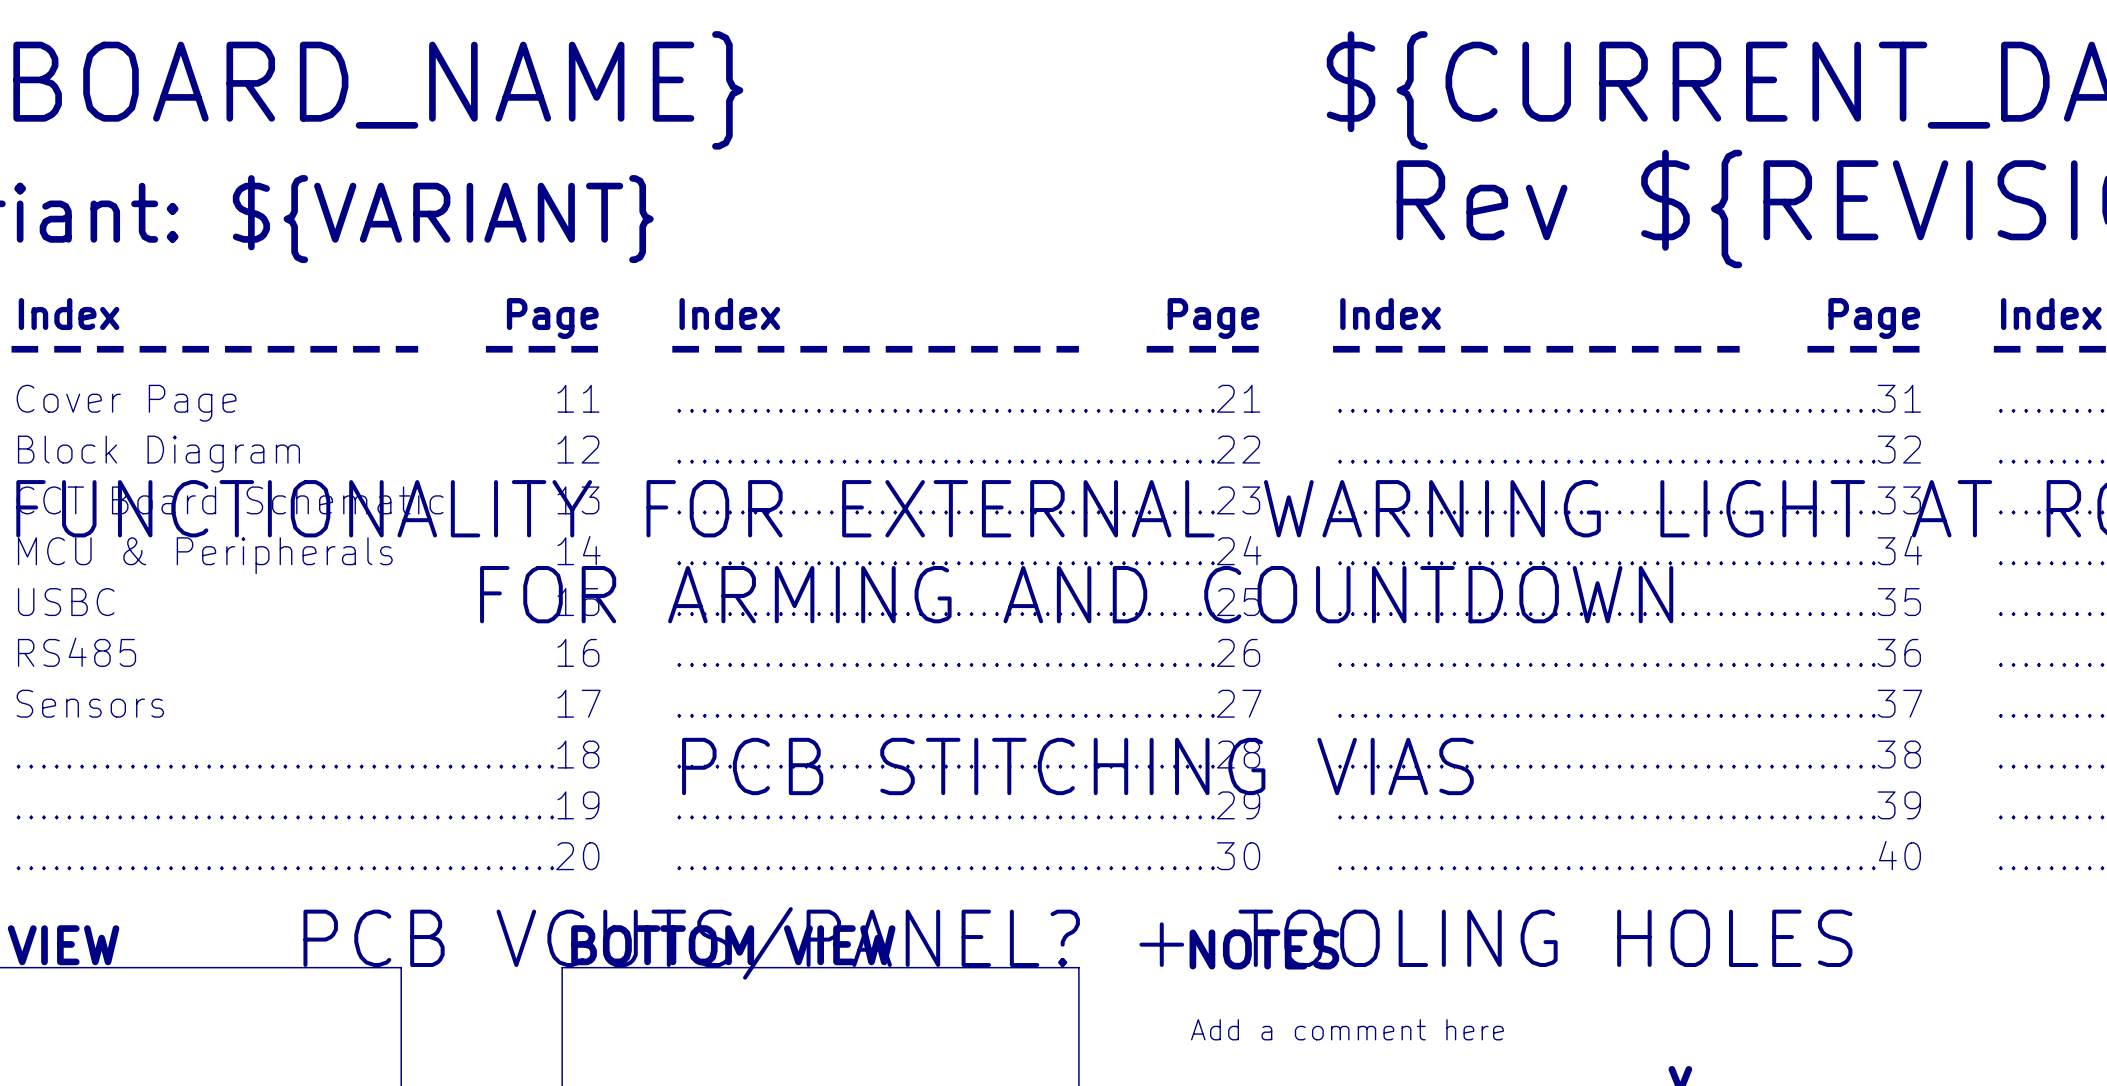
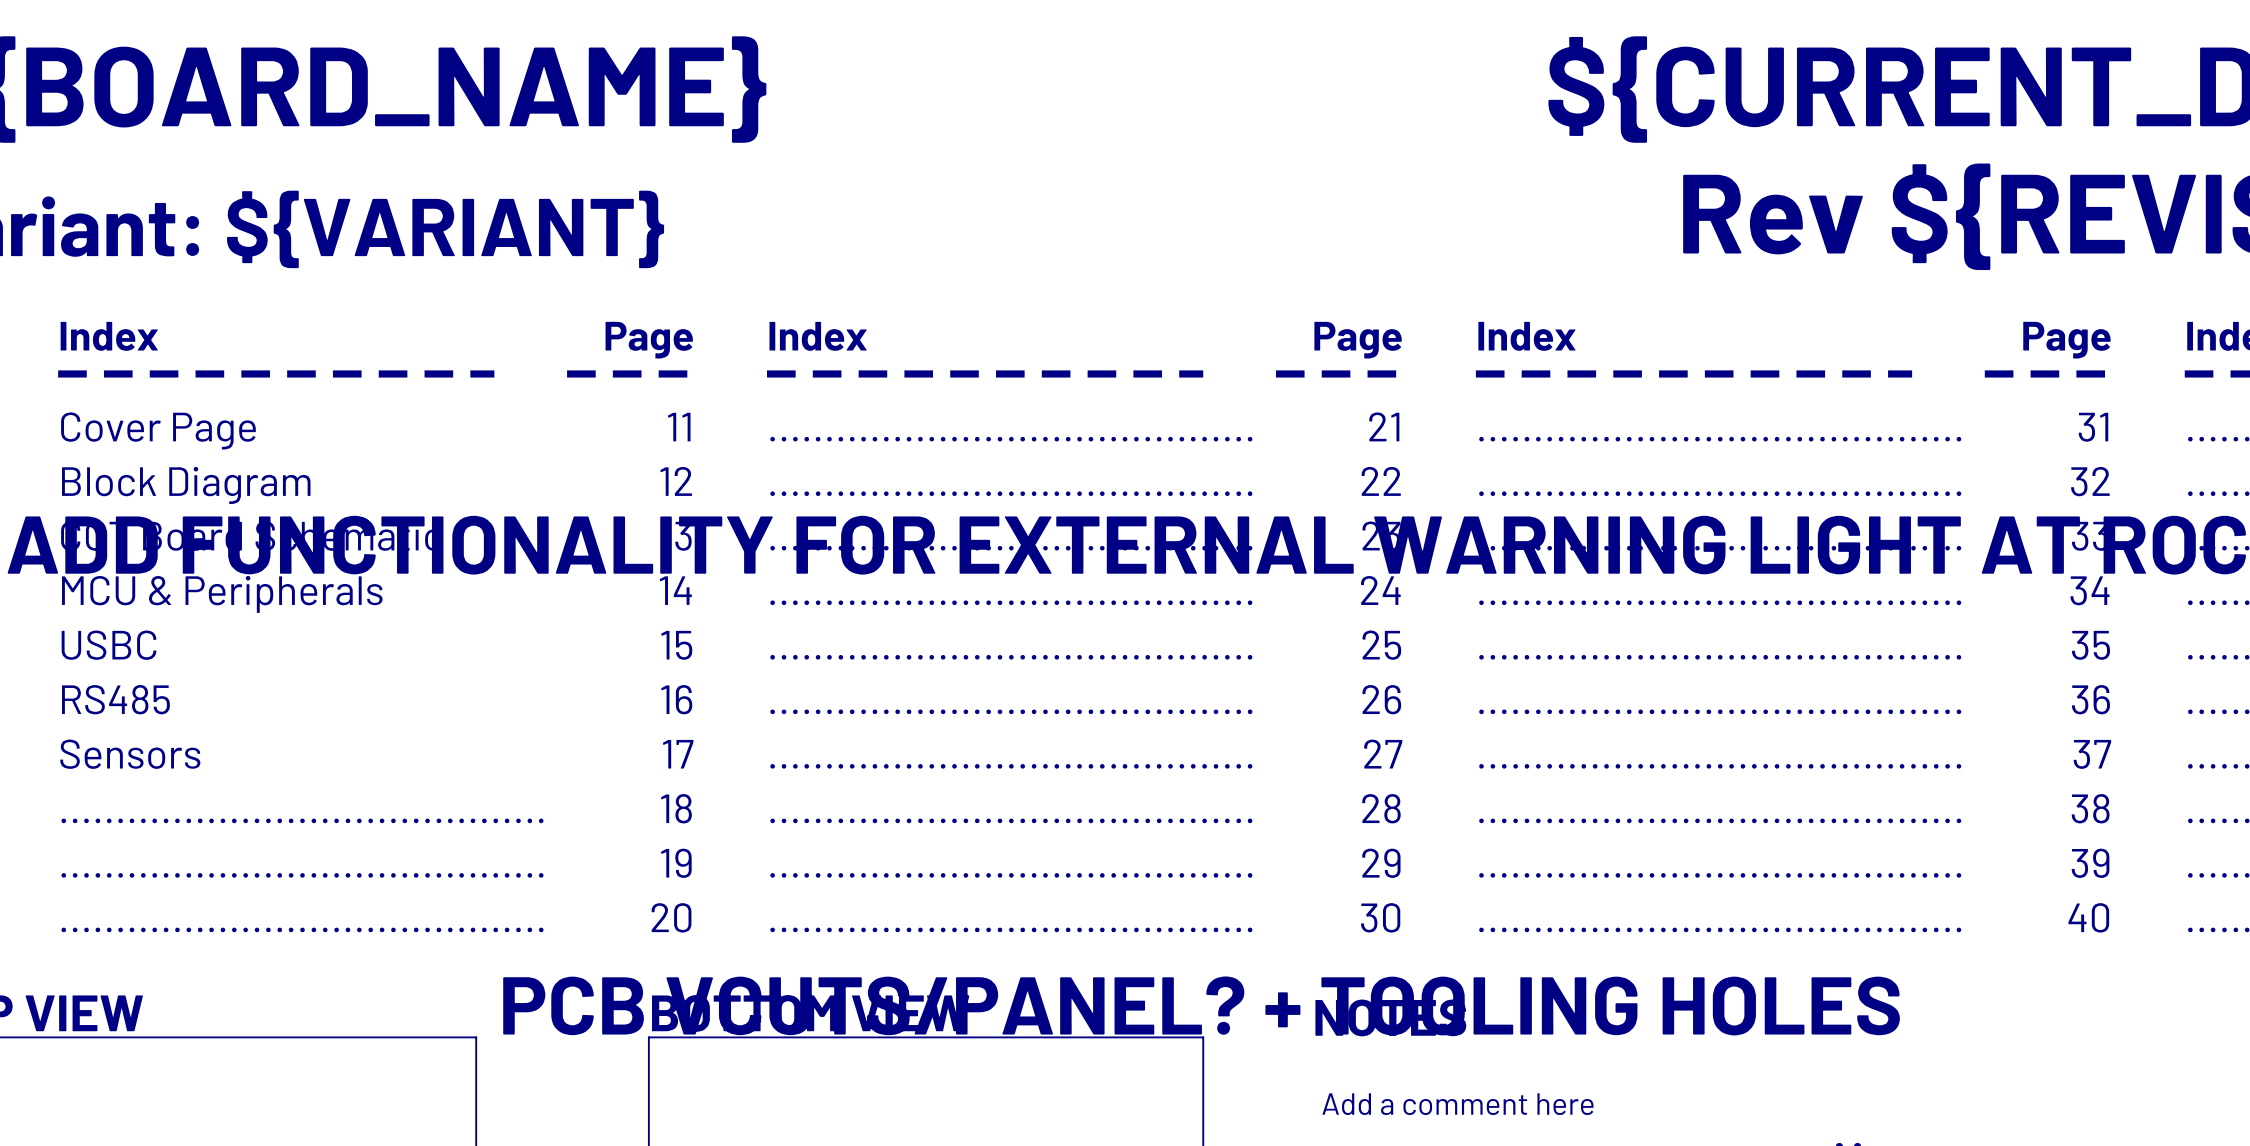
text: FOR ARMING AND COUNTDOWN (1076, 594) -> none
text: PCB STITCHING VIAS (1077, 766) -> none

